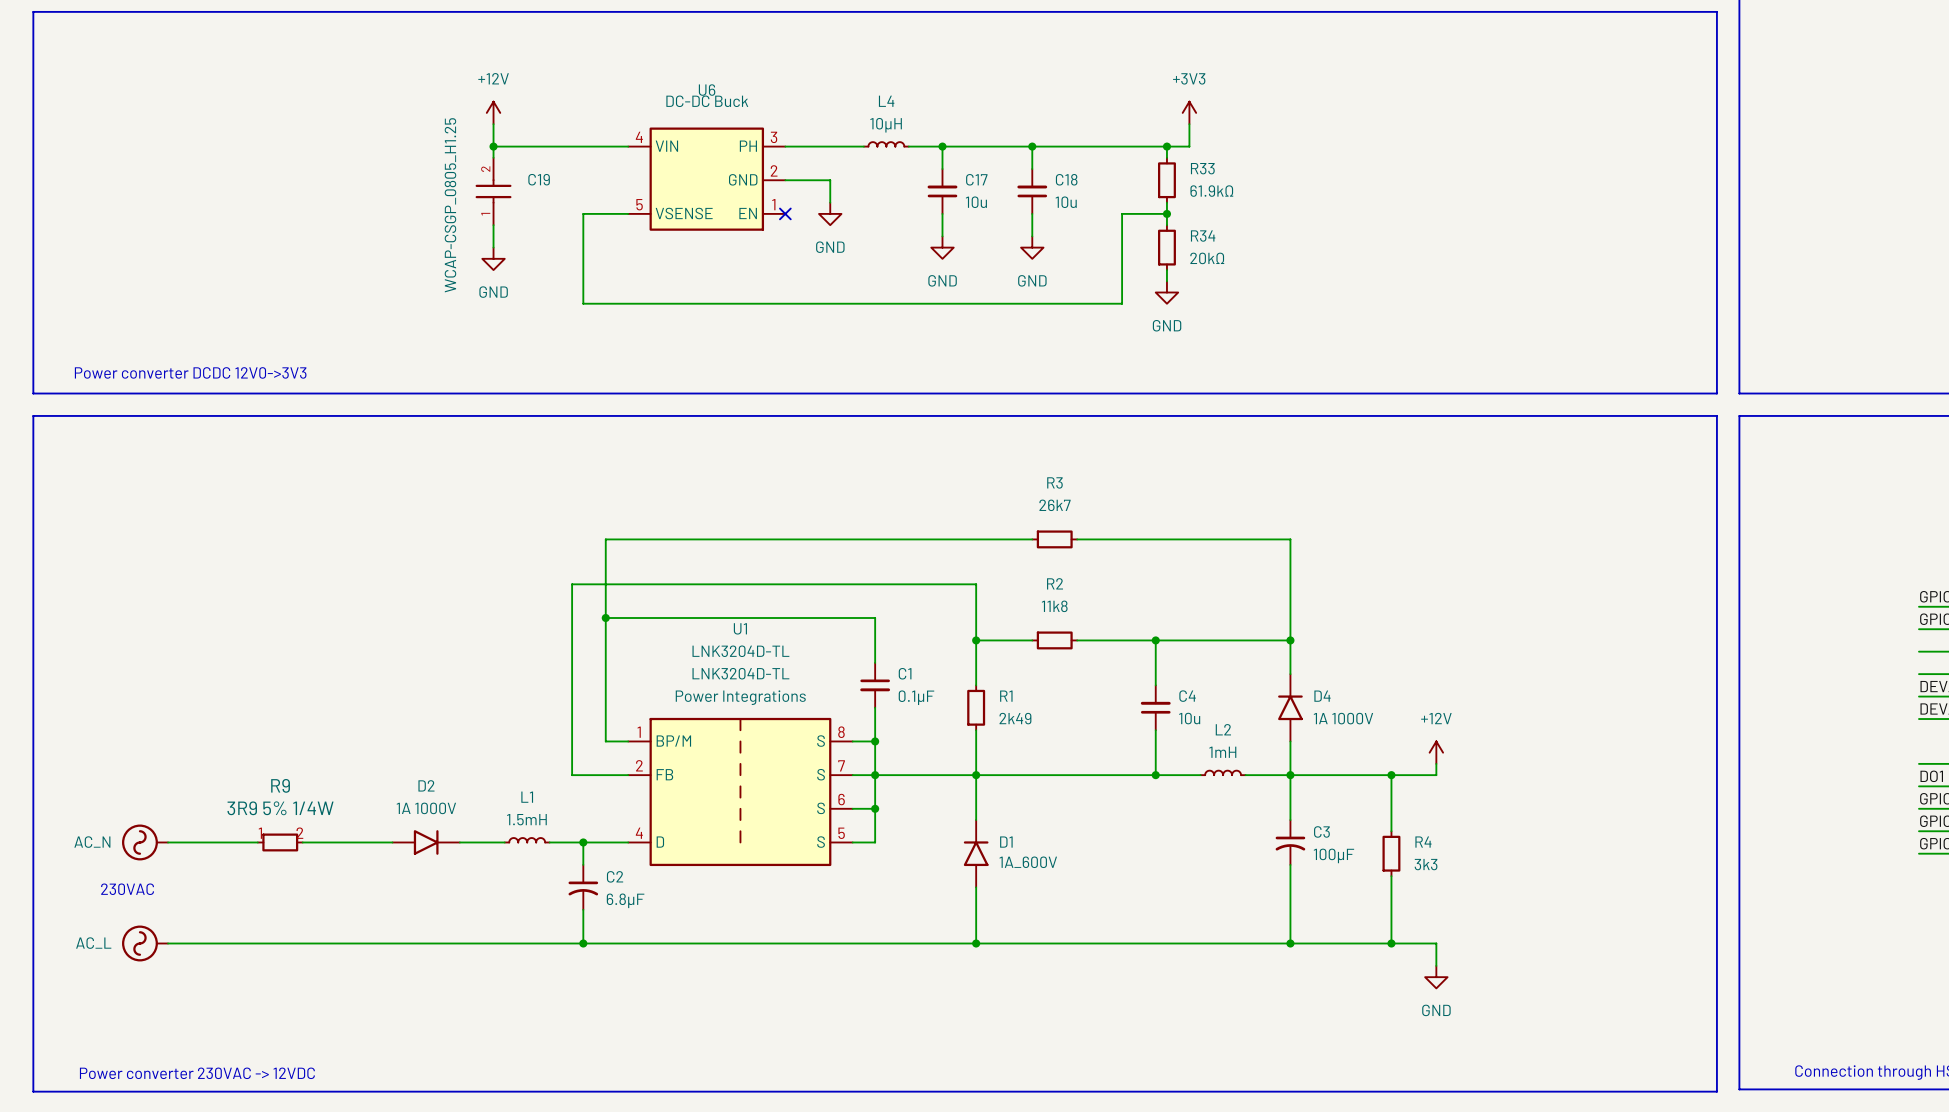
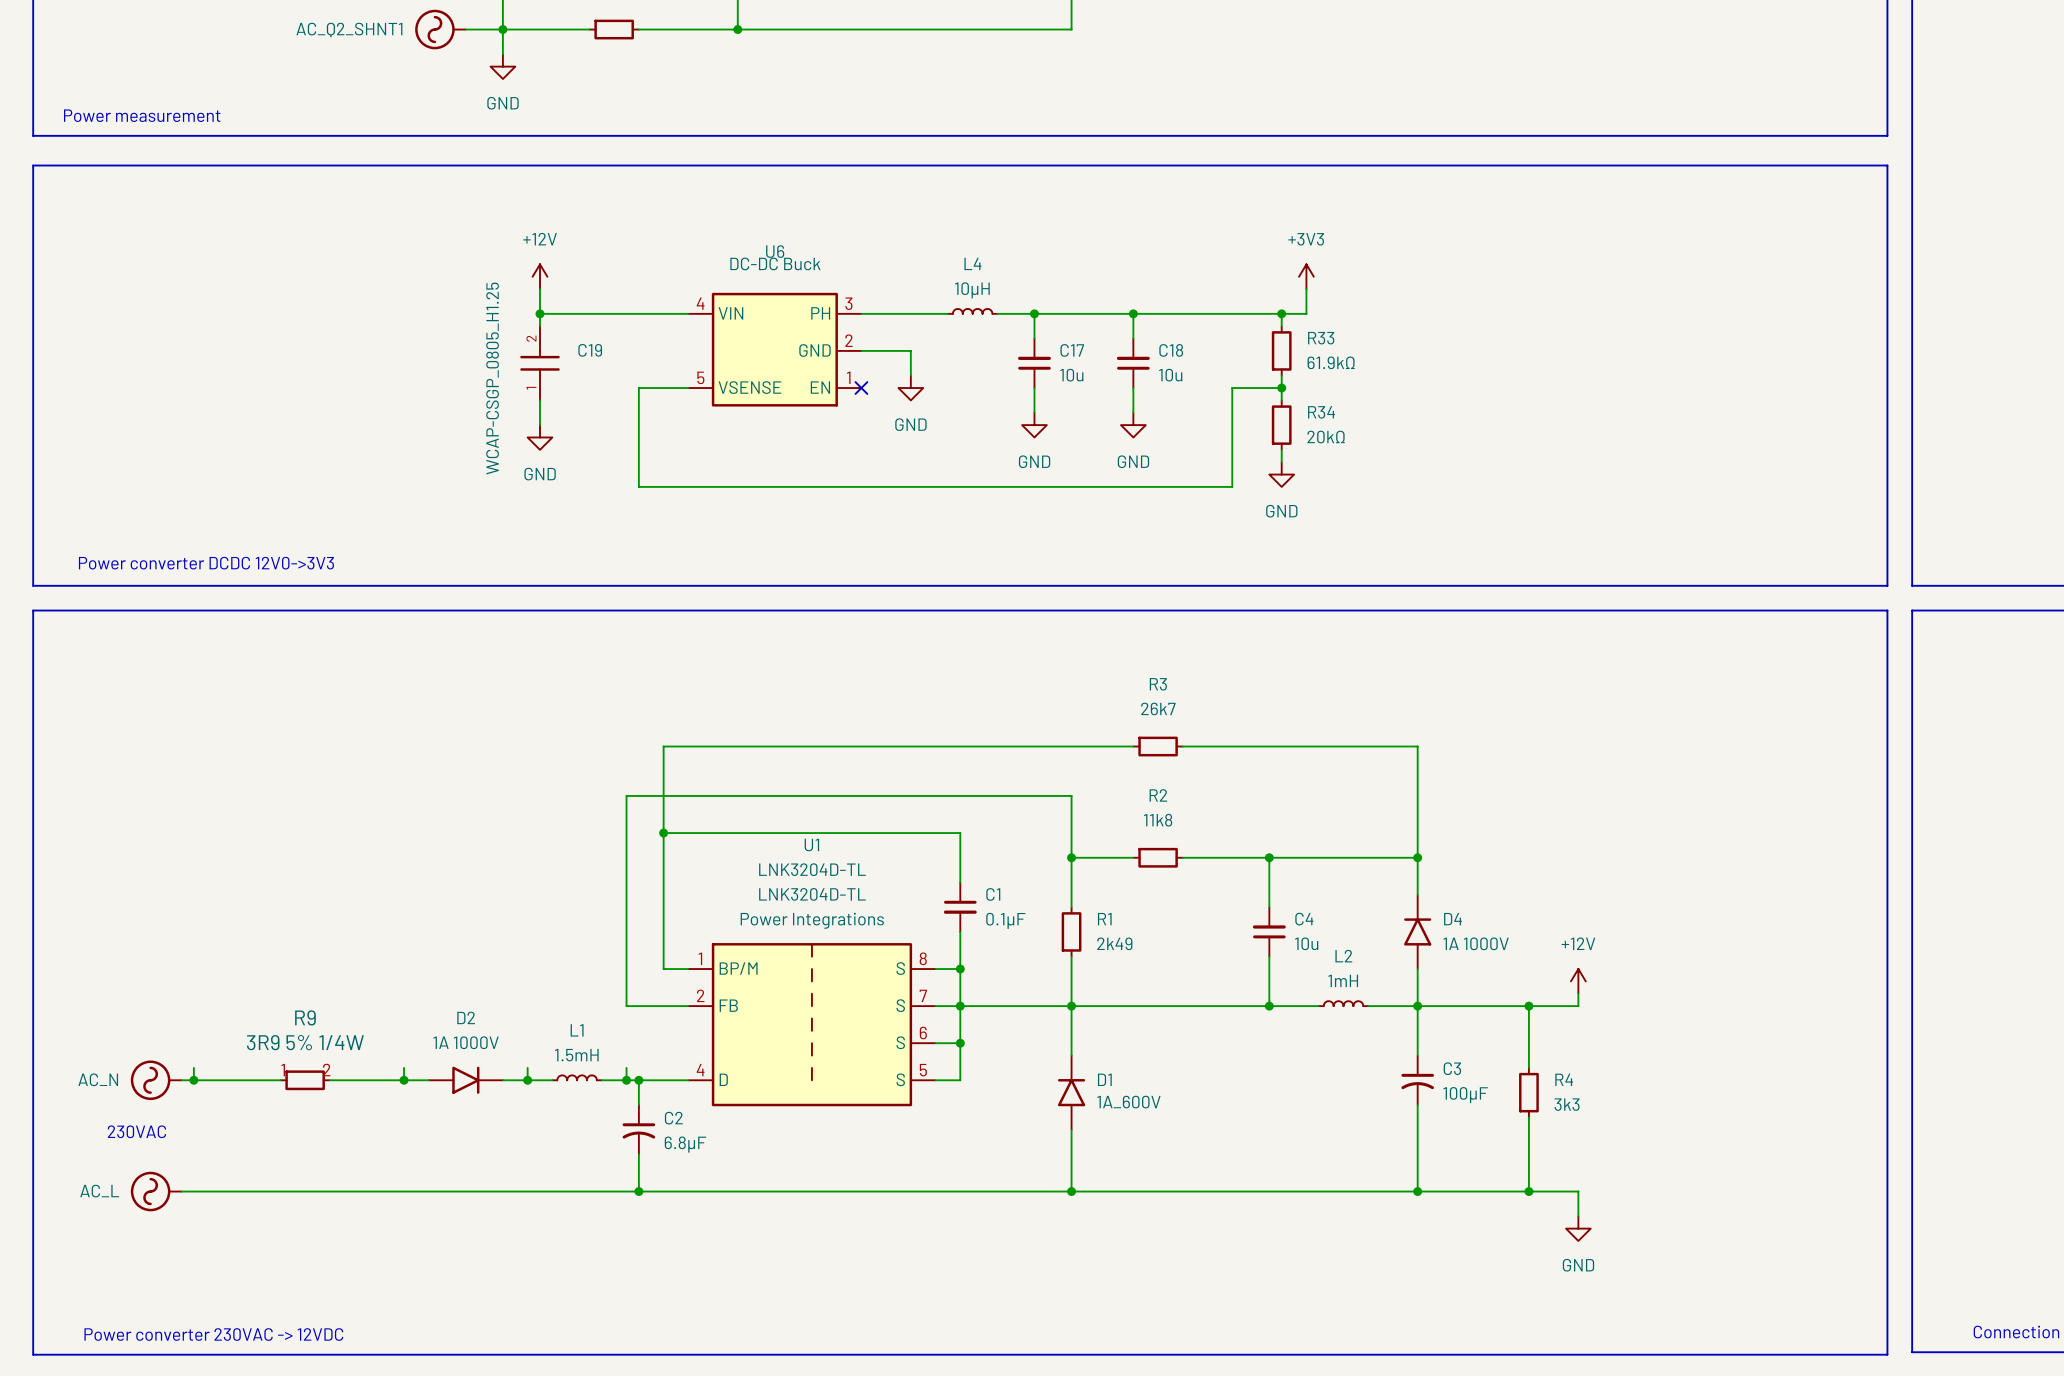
wire: none -> (193, 1067) (193, 1080)
wire: none -> (404, 1067) (404, 1080)
wire: none -> (527, 1067) (527, 1080)
wire: none -> (626, 1067) (626, 1080)
junction: none -> (193, 1080)
junction: none -> (404, 1080)
junction: none -> (527, 1080)
junction: none -> (626, 1080)

